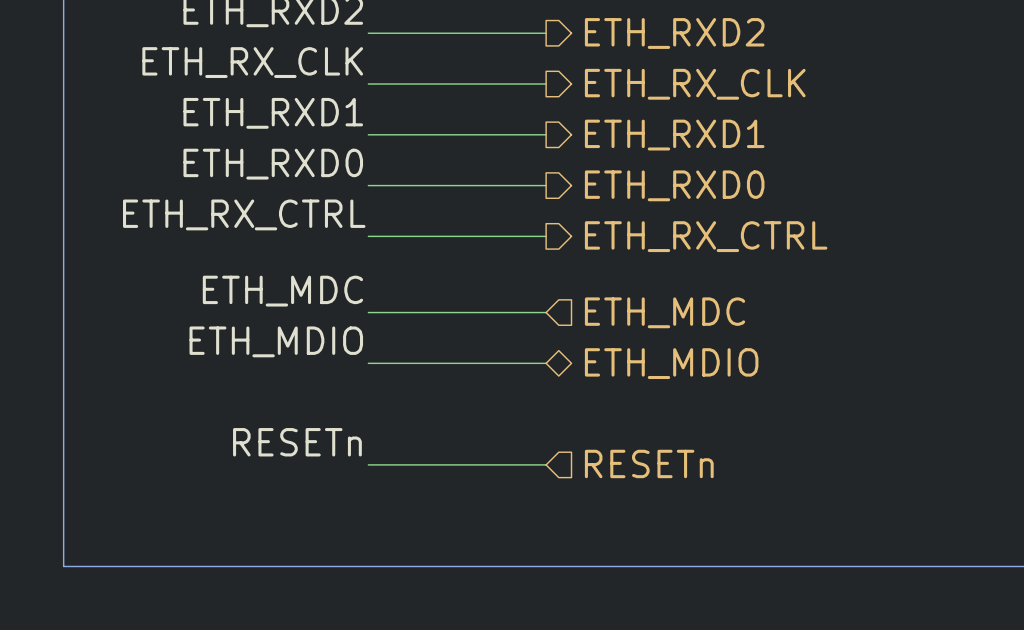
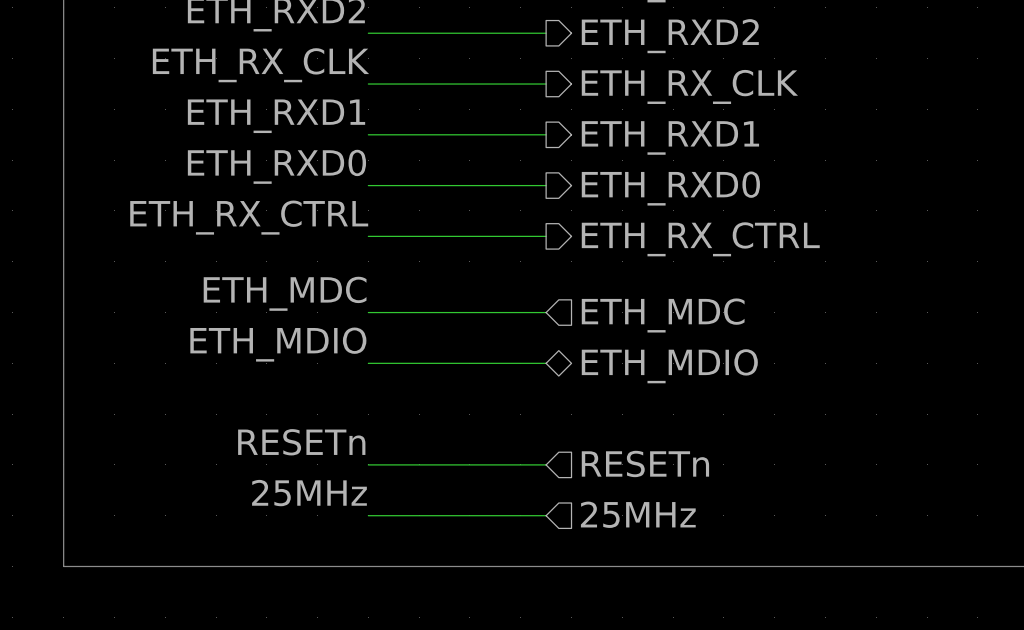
label: none -> 25MHz (309, 493)
hierarchical label: none -> 25MHz (638, 514)
wire: none -> (368, 515) (546, 515)

